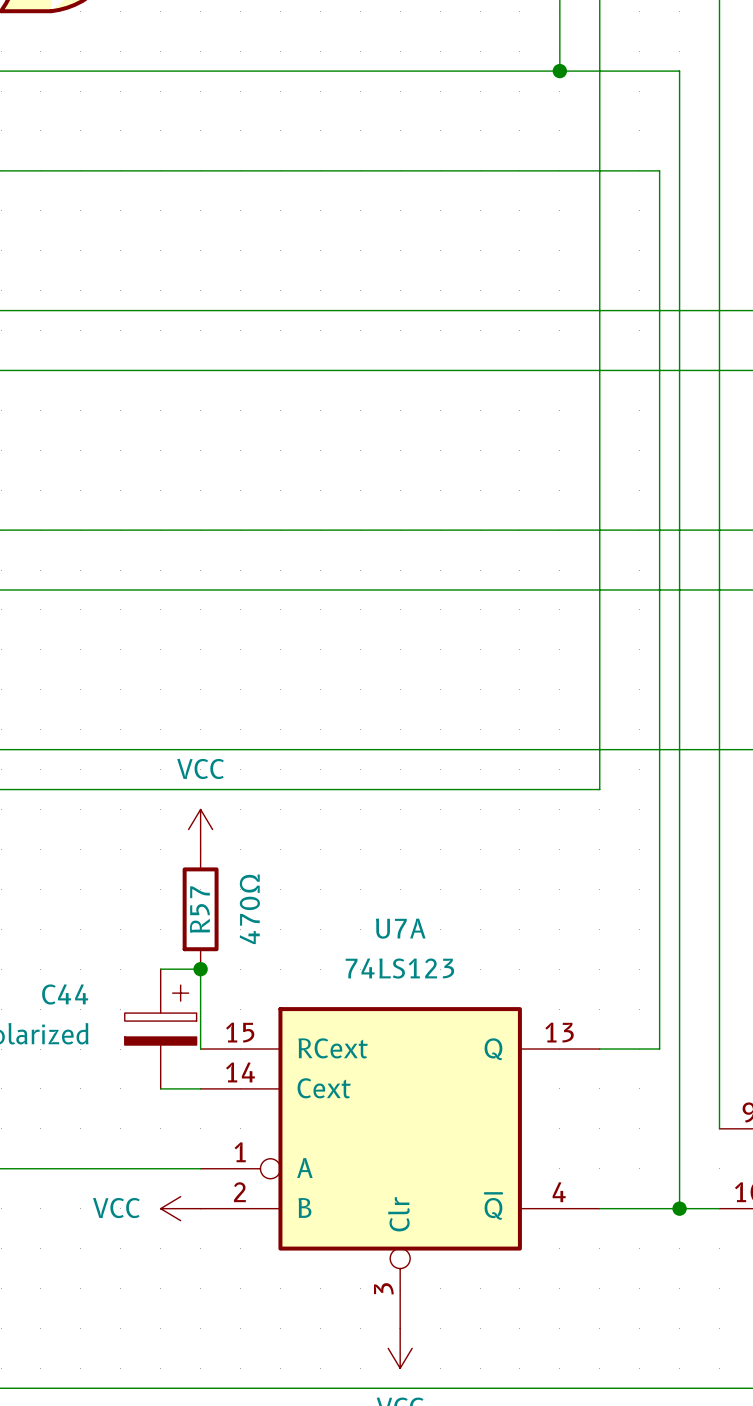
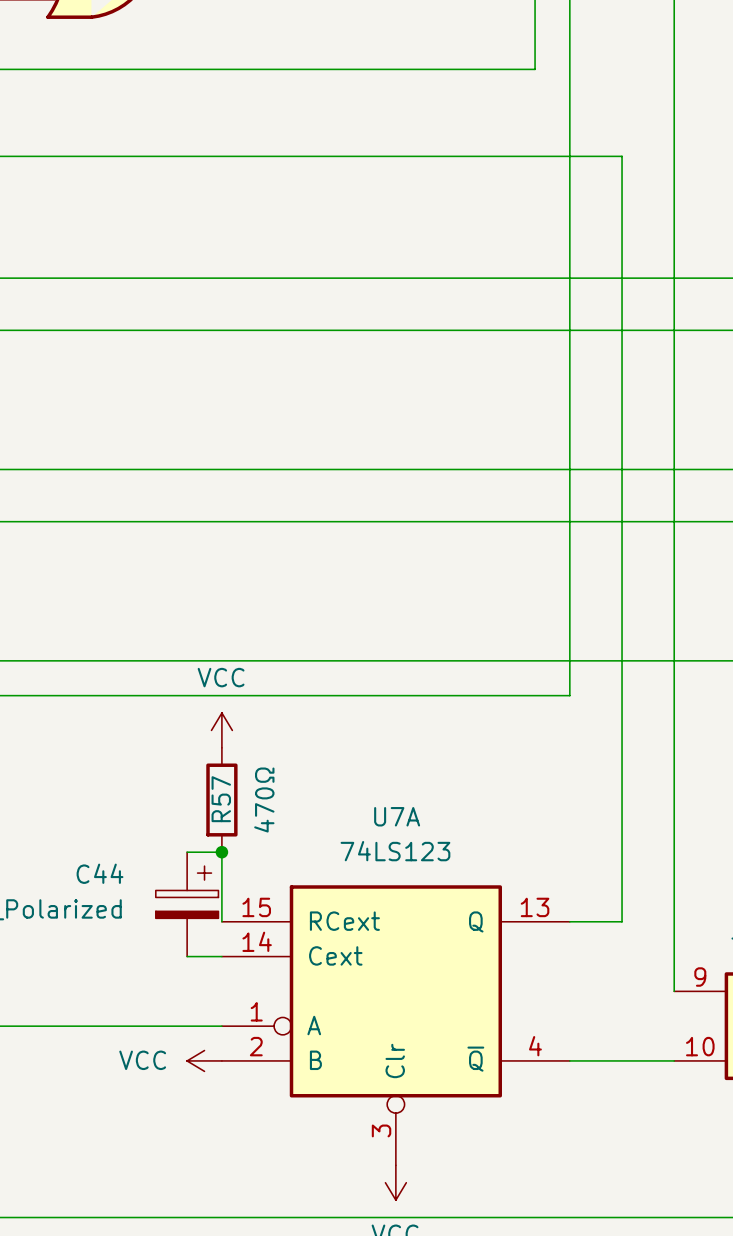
wire: (559, 71) (679, 71) (679, 1208) -> none
junction: (559, 71) -> none
junction: (679, 1208) -> none

